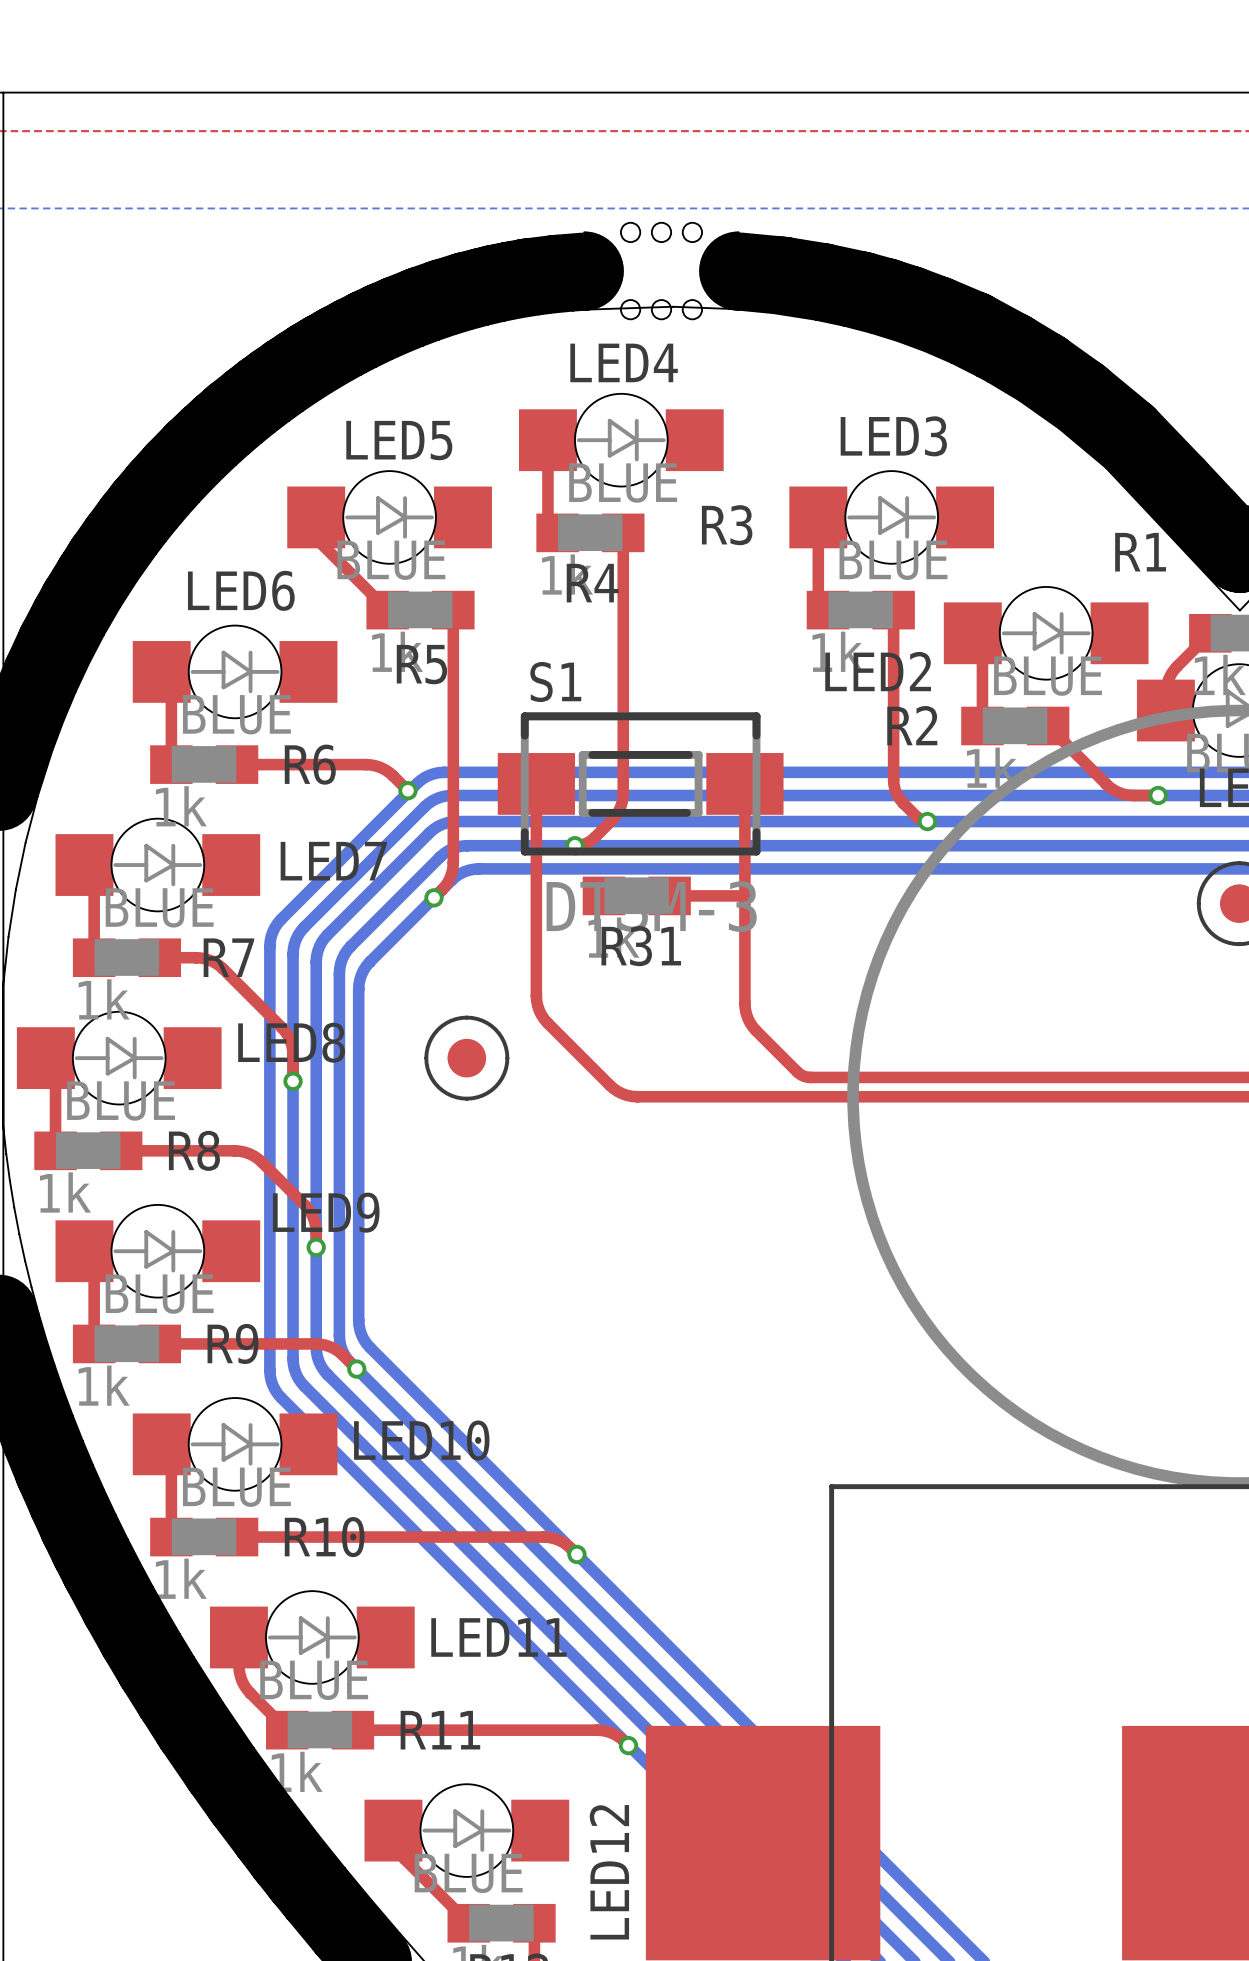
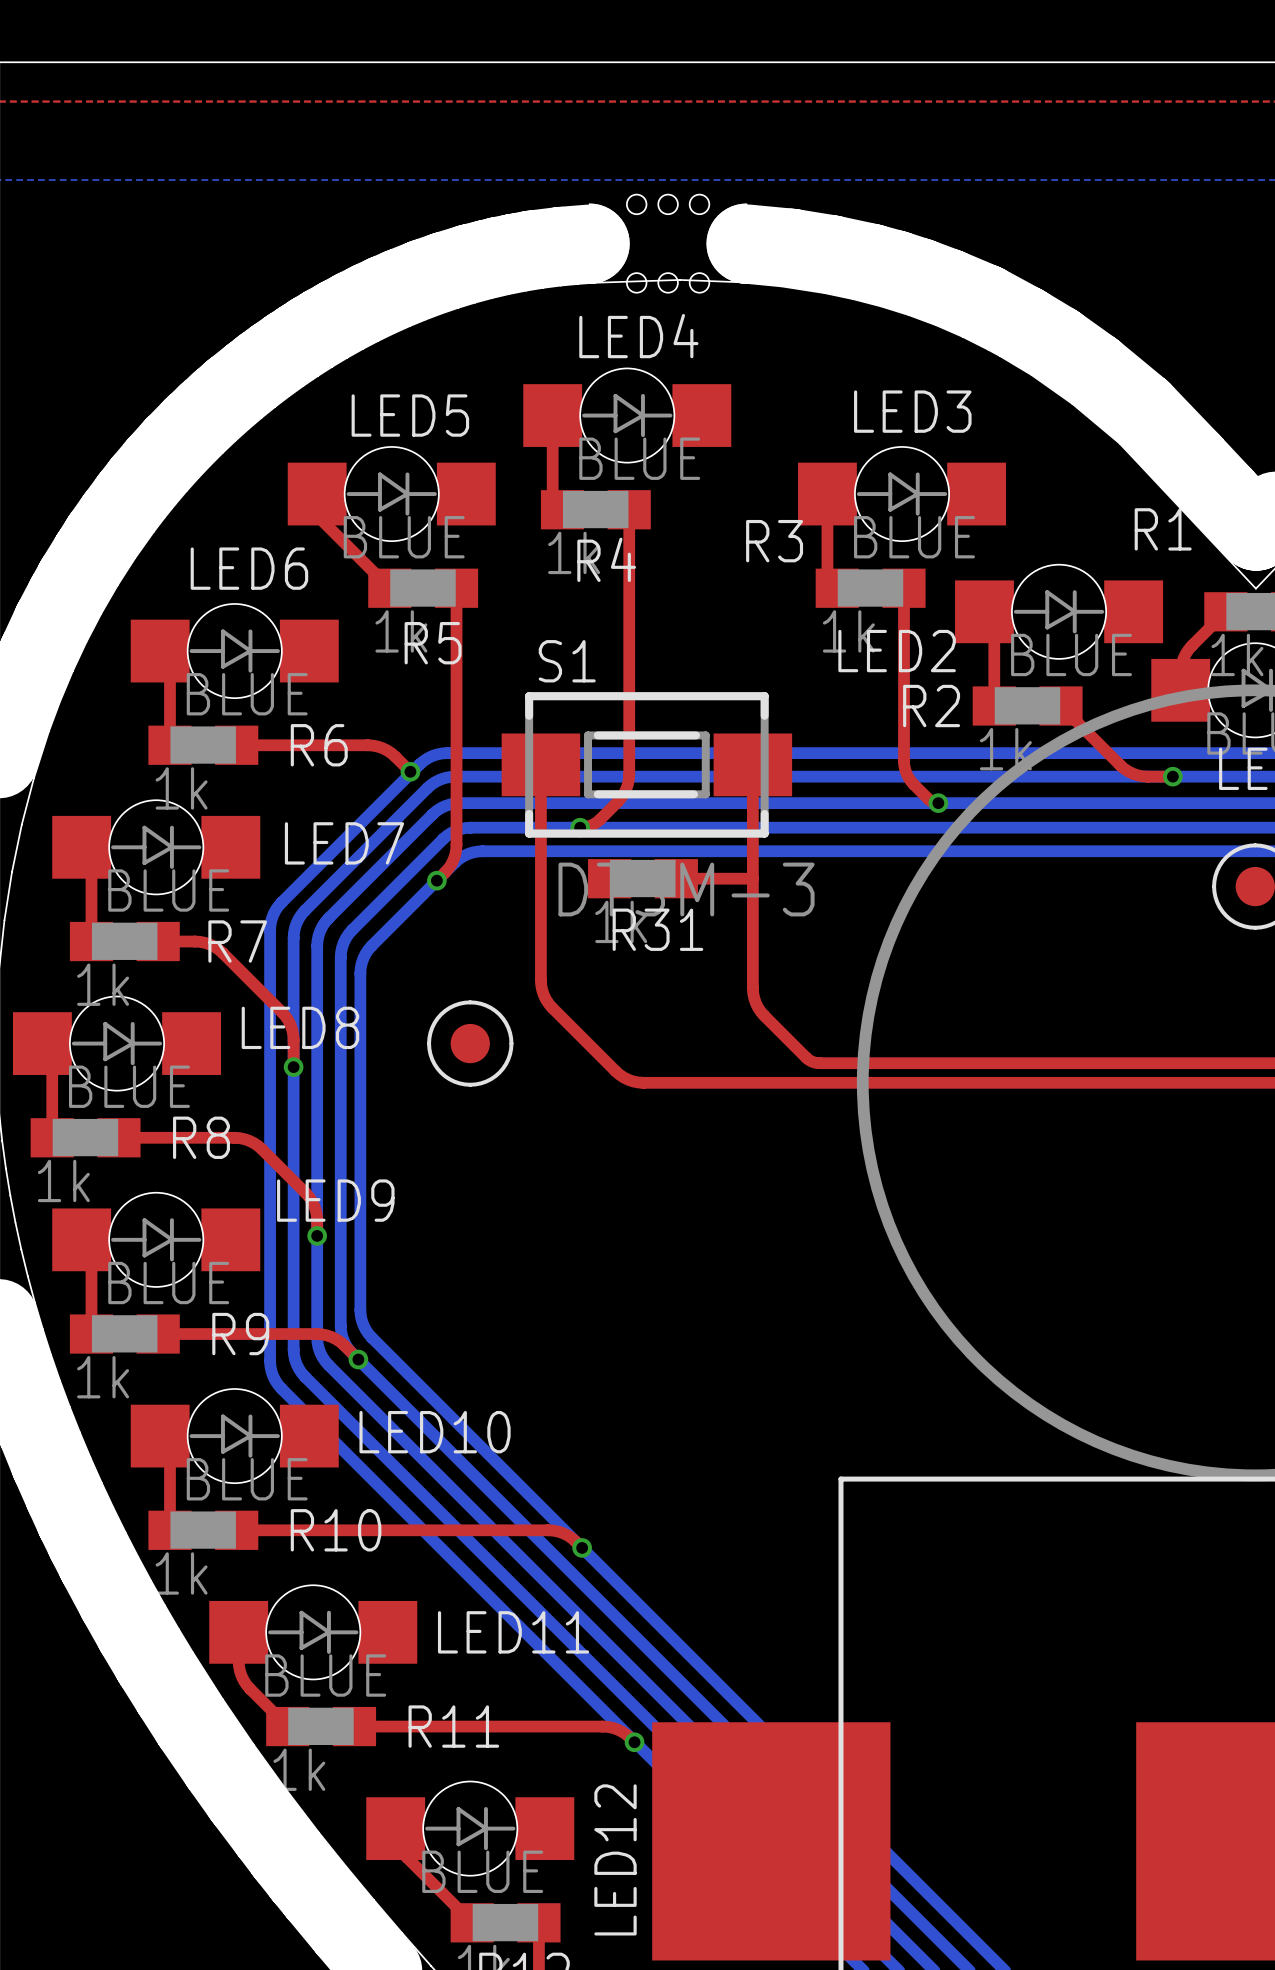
R3 name position: R3 (727, 525) -> R3 (774, 541)

